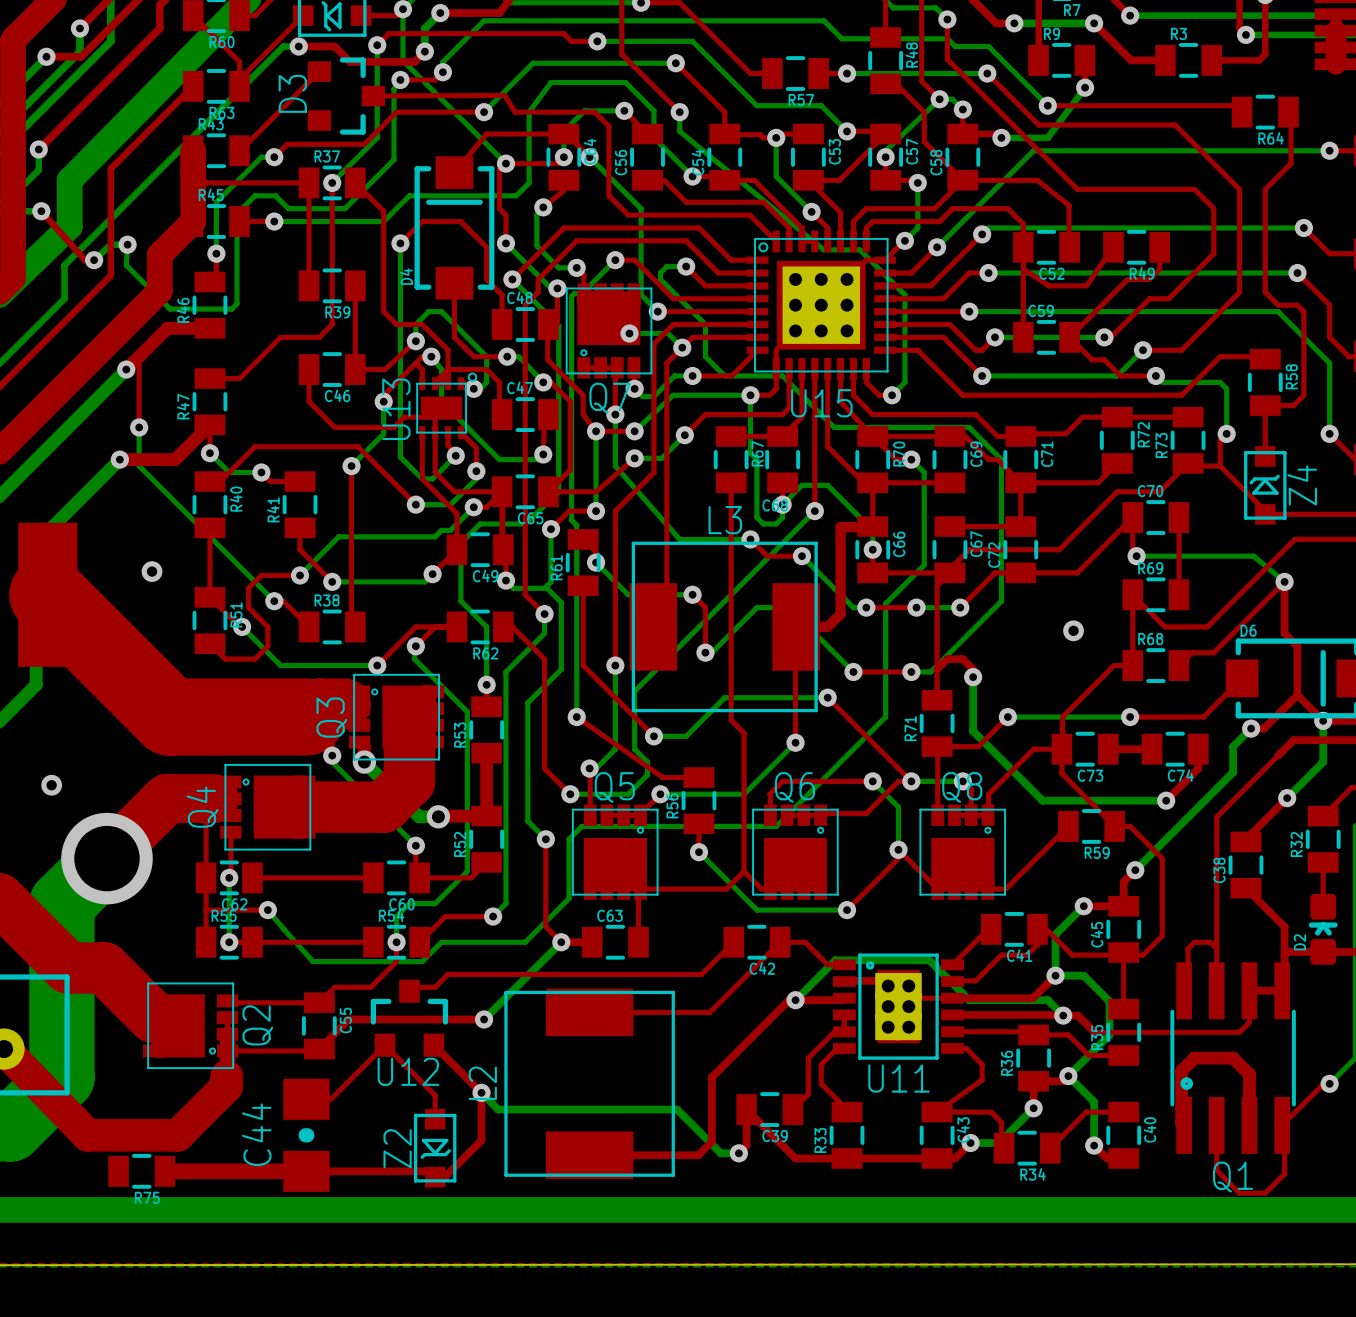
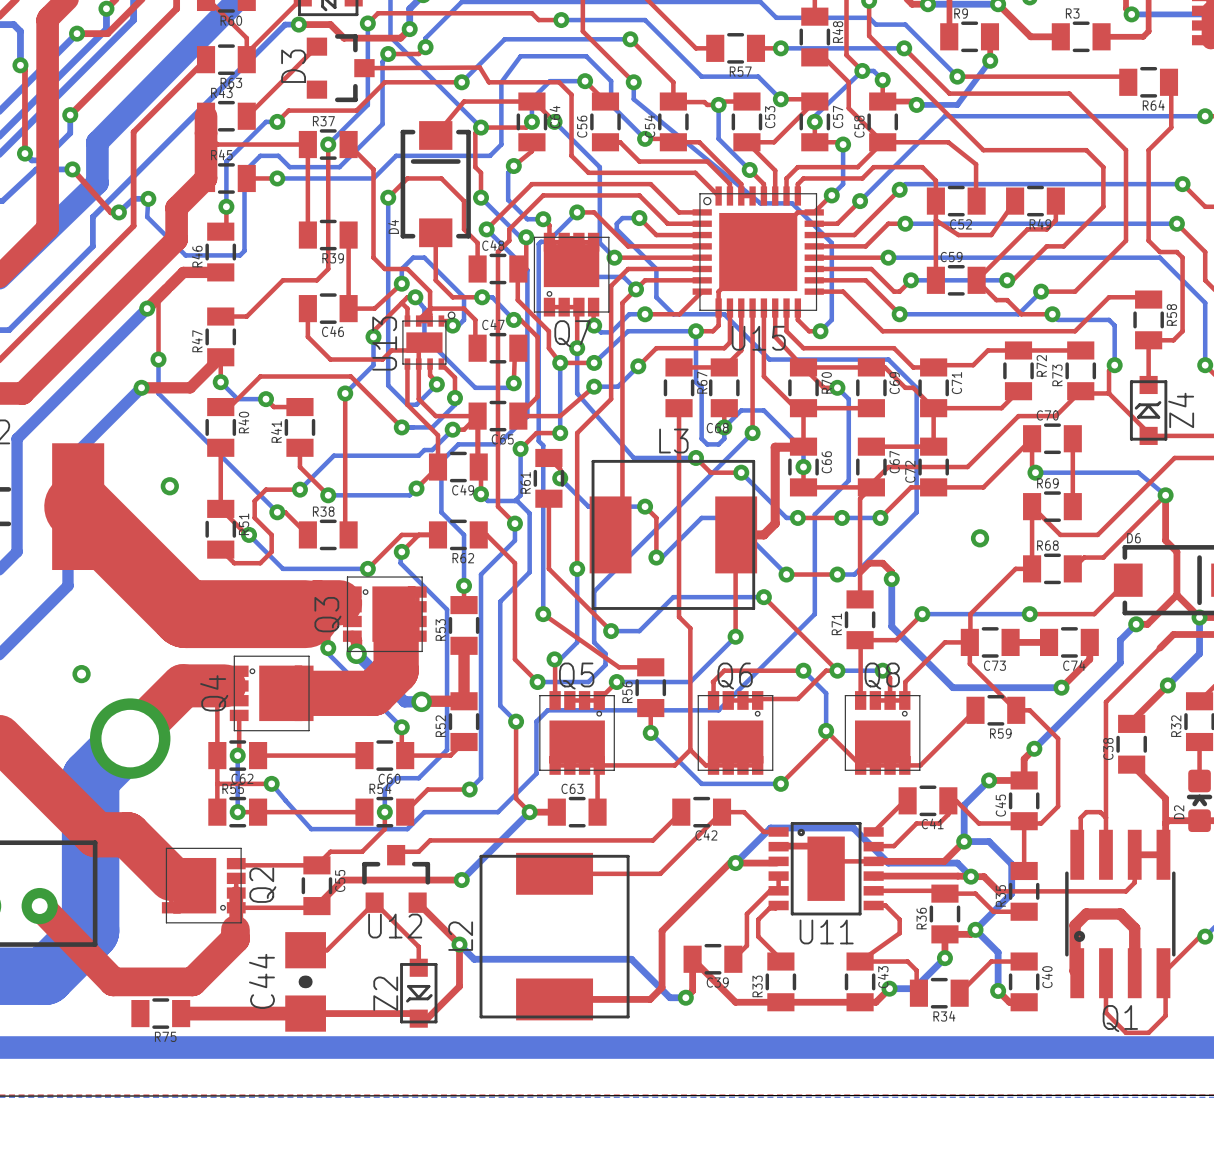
U15 footprint: [746, 230, 896, 380] -> [692, 186, 824, 318]
via: (629, 333) -> none
U11 footprint: [833, 953, 964, 1060] -> [768, 822, 884, 916]

